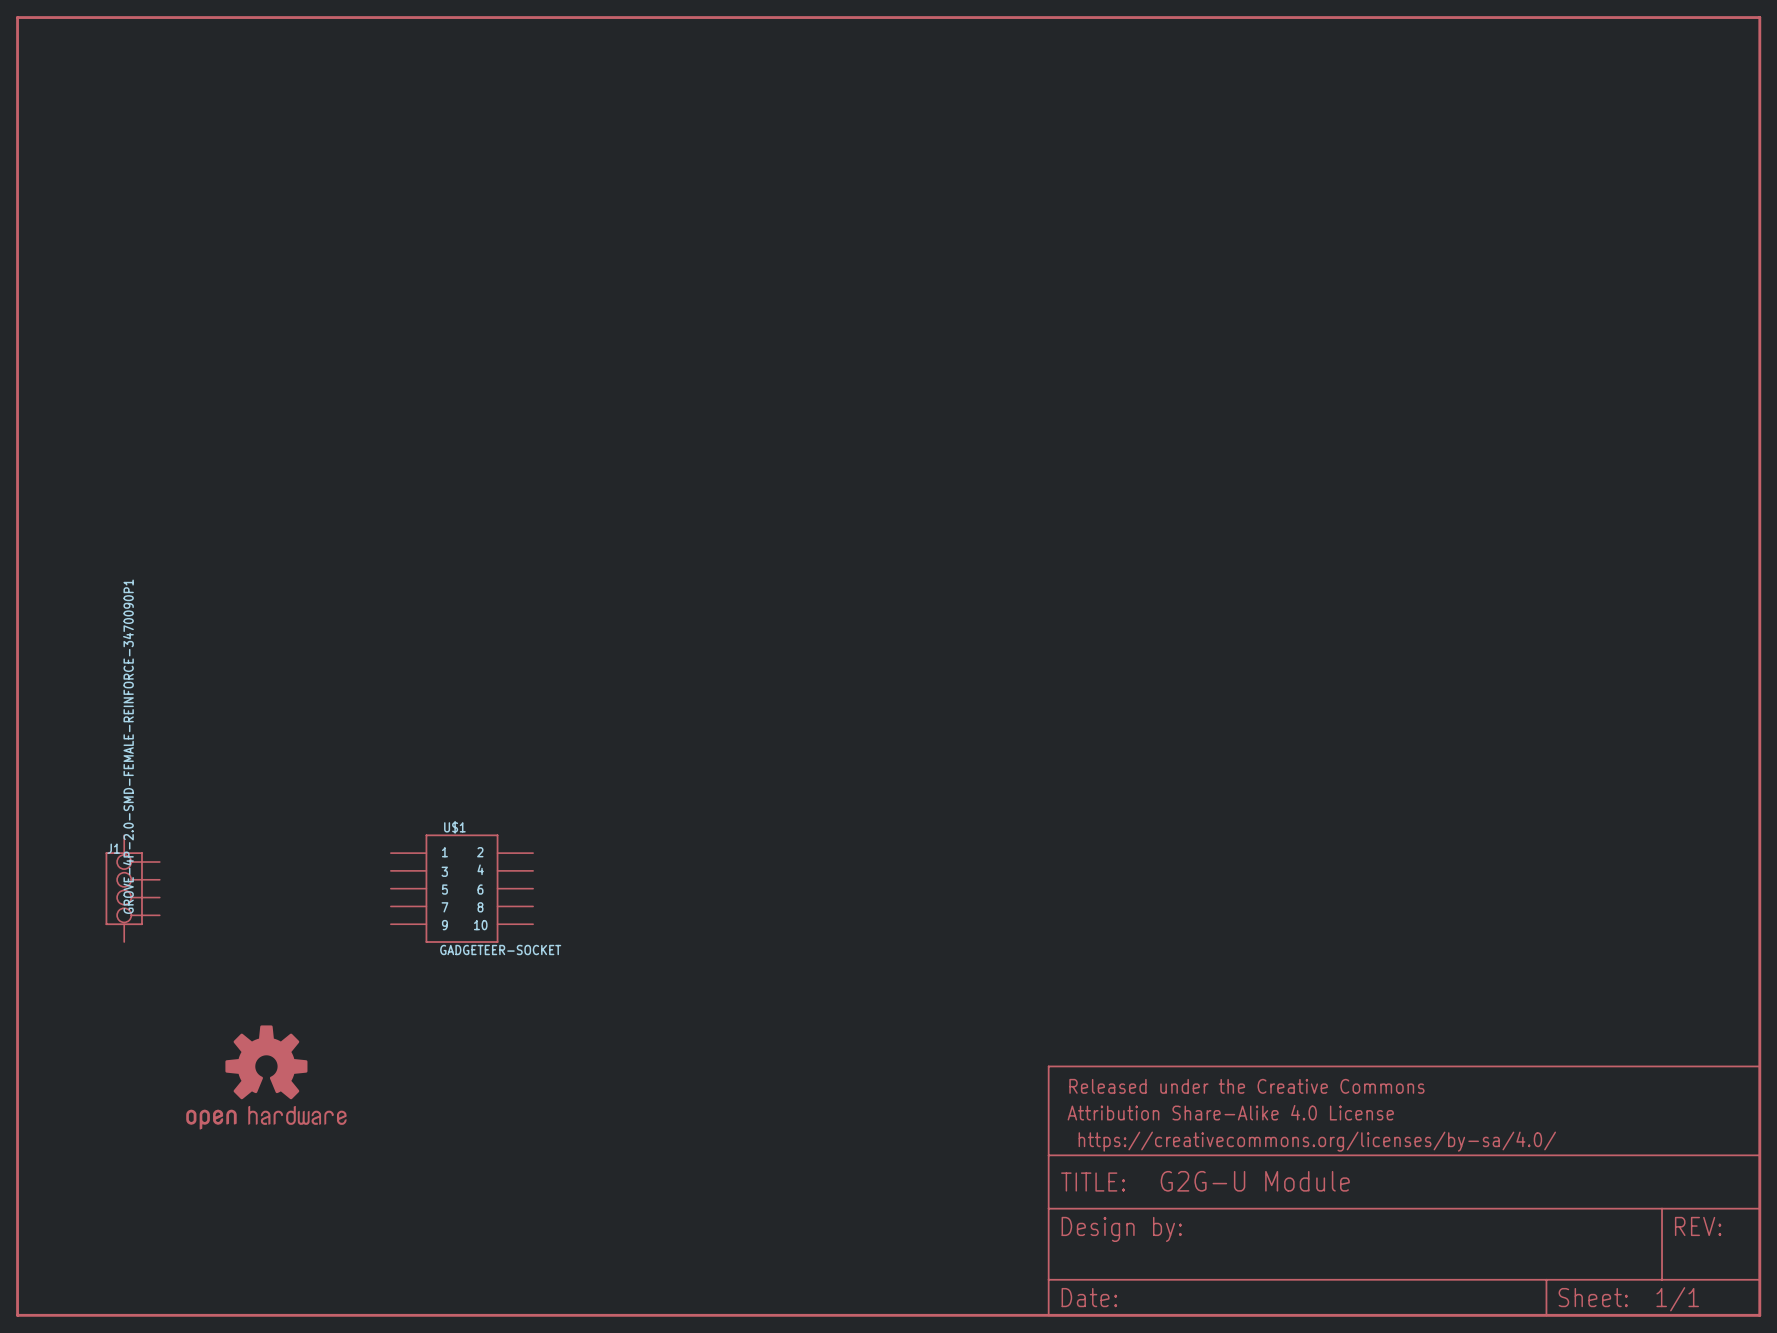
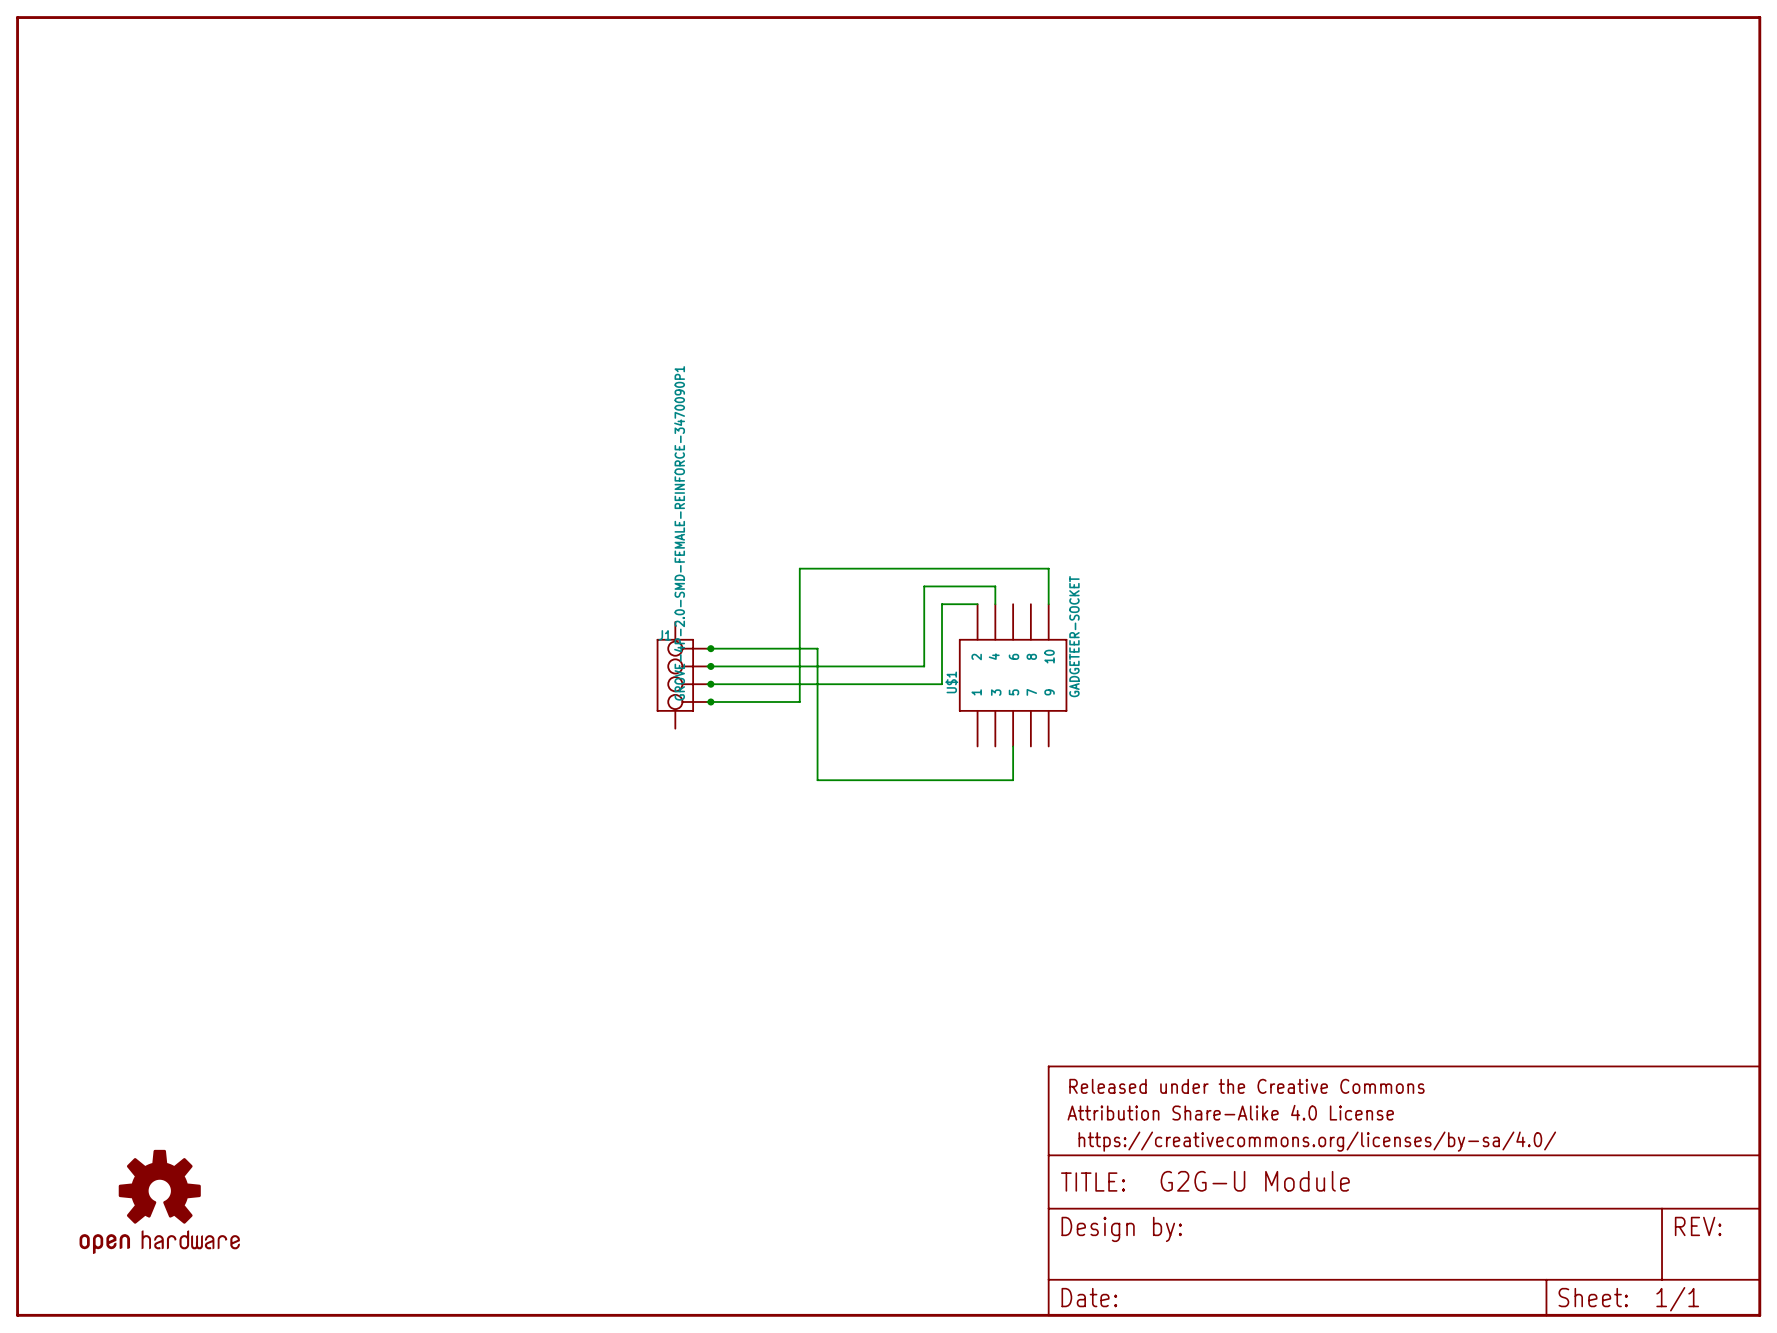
wire: none -> (977, 604) (942, 604) (942, 684) (707, 684)
wire: none -> (995, 604) (995, 586) (924, 586) (924, 666) (707, 666)
wire: none -> (1048, 604) (1048, 568) (799, 568) (799, 702) (707, 702)
wire: none -> (707, 648) (817, 648) (817, 780) (1013, 780) (1013, 746)
junction: none -> (710, 648)
junction: none -> (710, 666)
junction: none -> (710, 684)
junction: none -> (710, 702)
J1 position: (132, 888) -> (683, 675)
U$1 rotation: 0° (461, 888) -> 90° counterclockwise (1013, 675)
U$1 position: (461, 888) -> (1013, 675)
part position: (266, 1077) -> (159, 1201)

